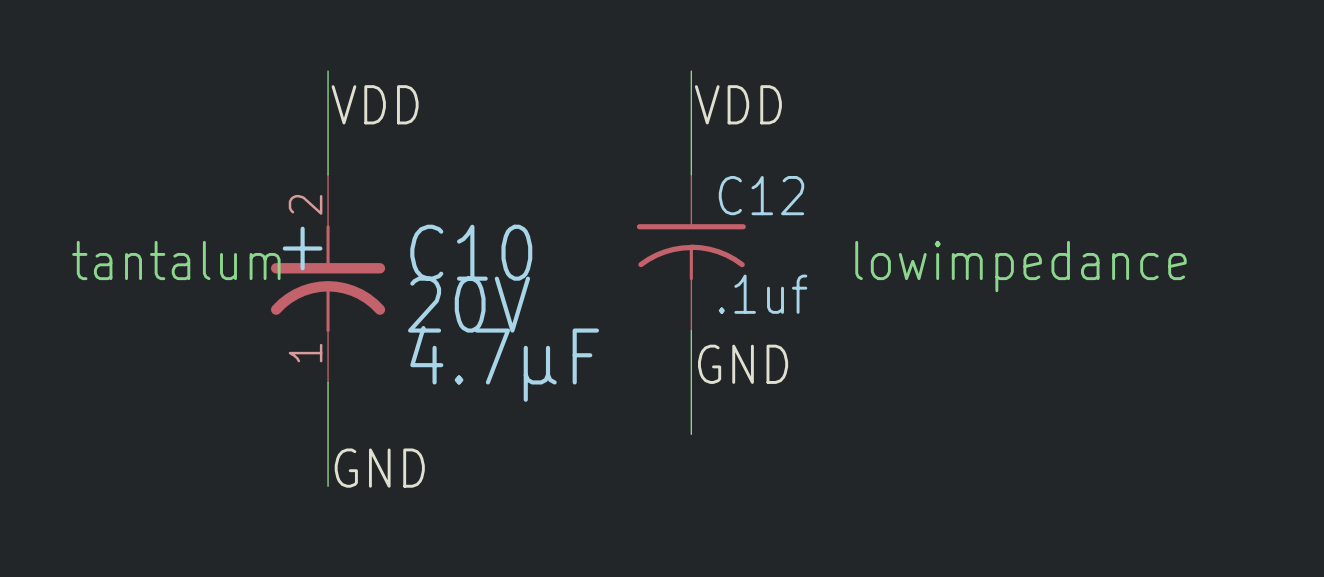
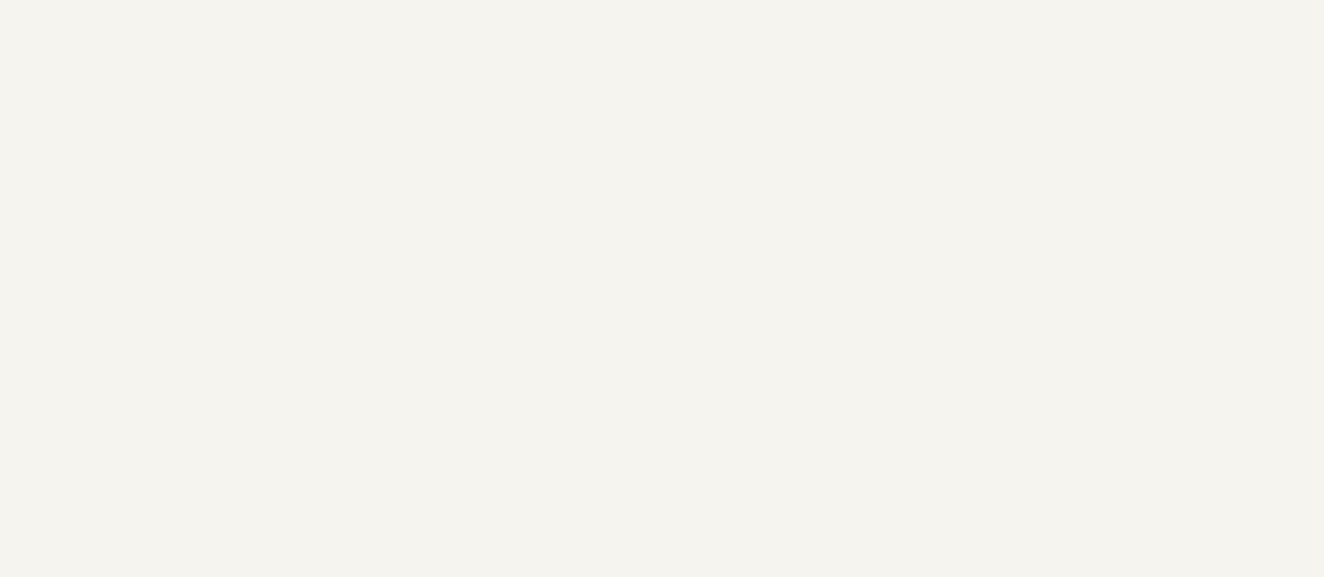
wire: (328, 71) (328, 174) -> none
wire: (691, 71) (691, 174) -> none
label: VDD (375, 104) -> none
label: VDD (738, 104) -> none
C12: .1uf (691, 252) -> none
text: tantalum (176, 260) -> none
text: lowimpedance (1020, 266) -> none
C10: (328, 278) -> none
wire: (691, 330) (691, 434) -> none
label: GND (743, 364) -> none
wire: (328, 382) (328, 486) -> none
label: GND (379, 468) -> none

